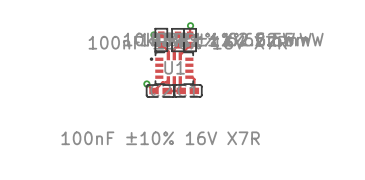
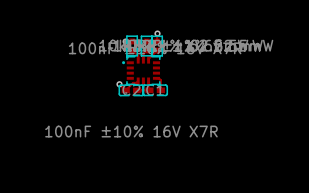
U1 name: U1 (174, 67) -> none

